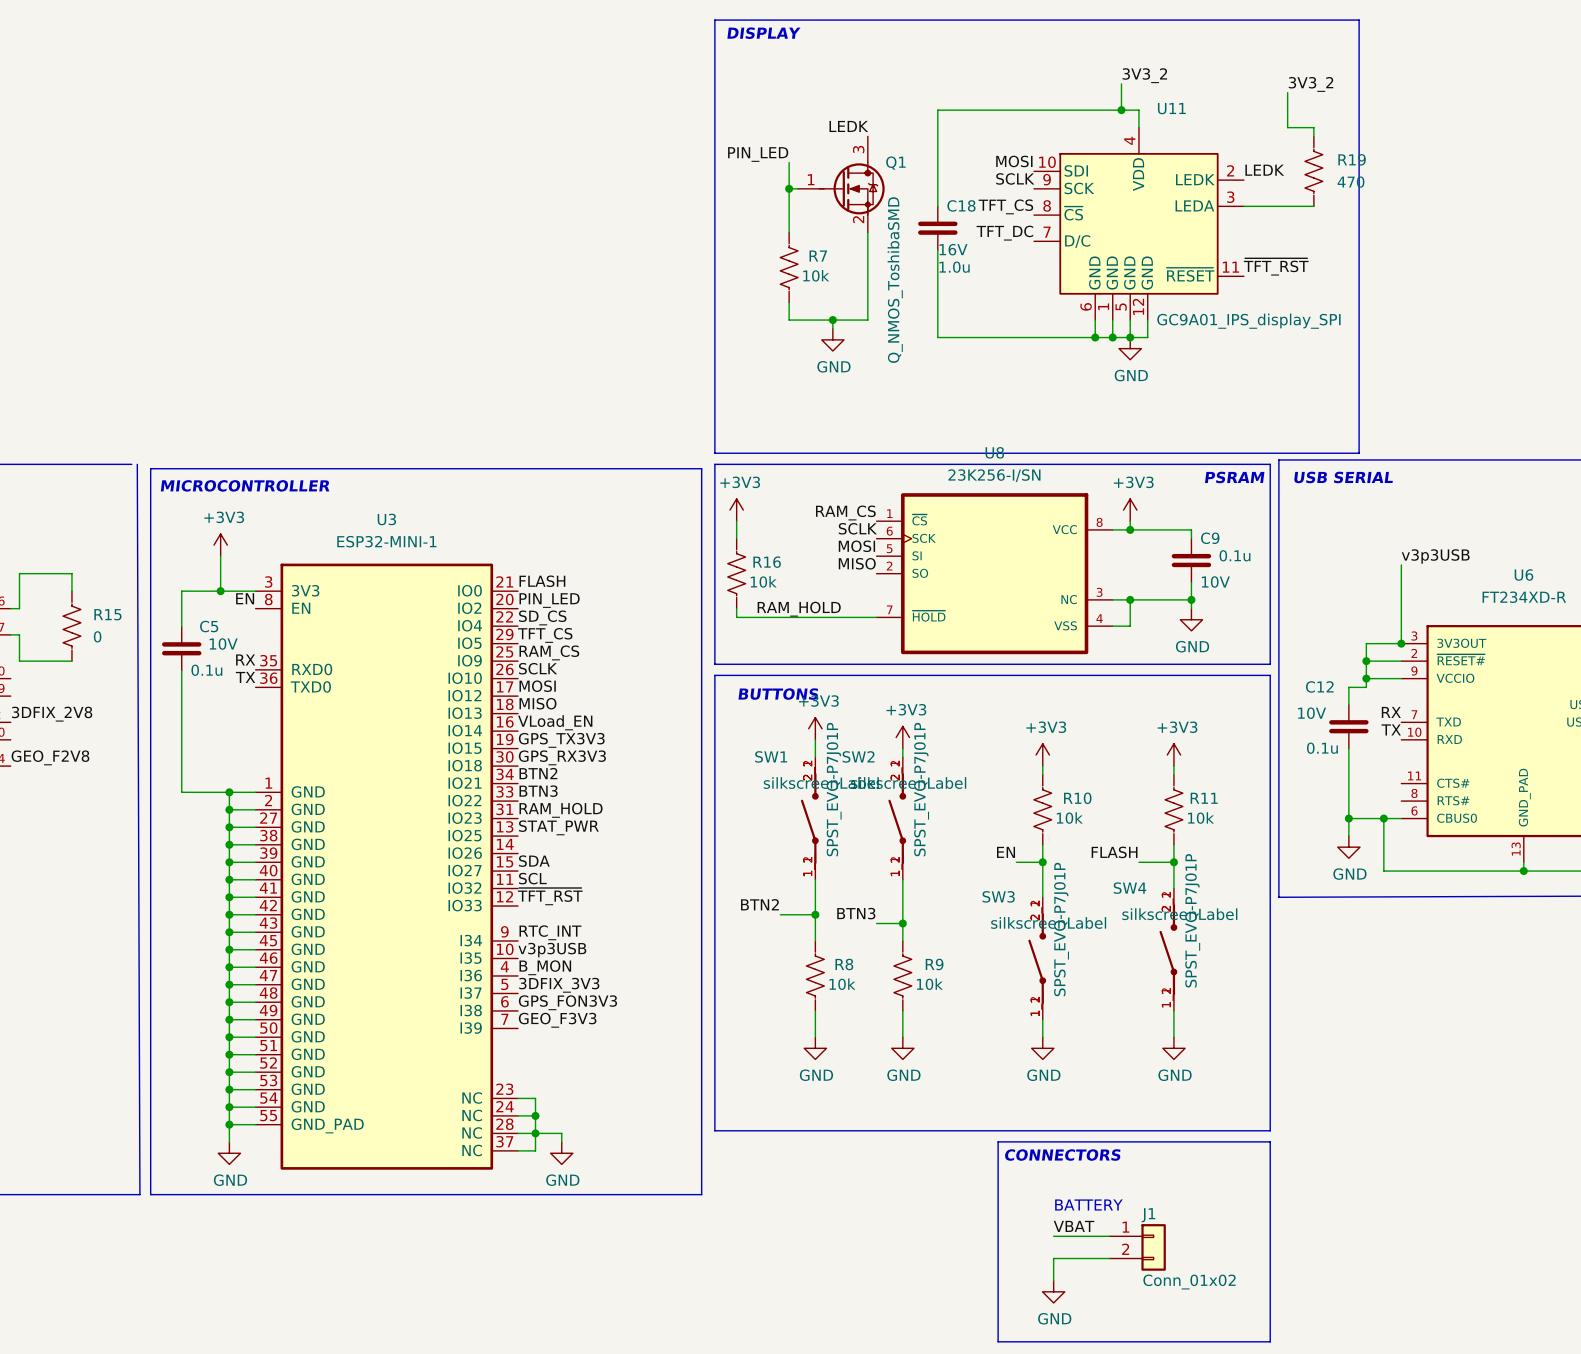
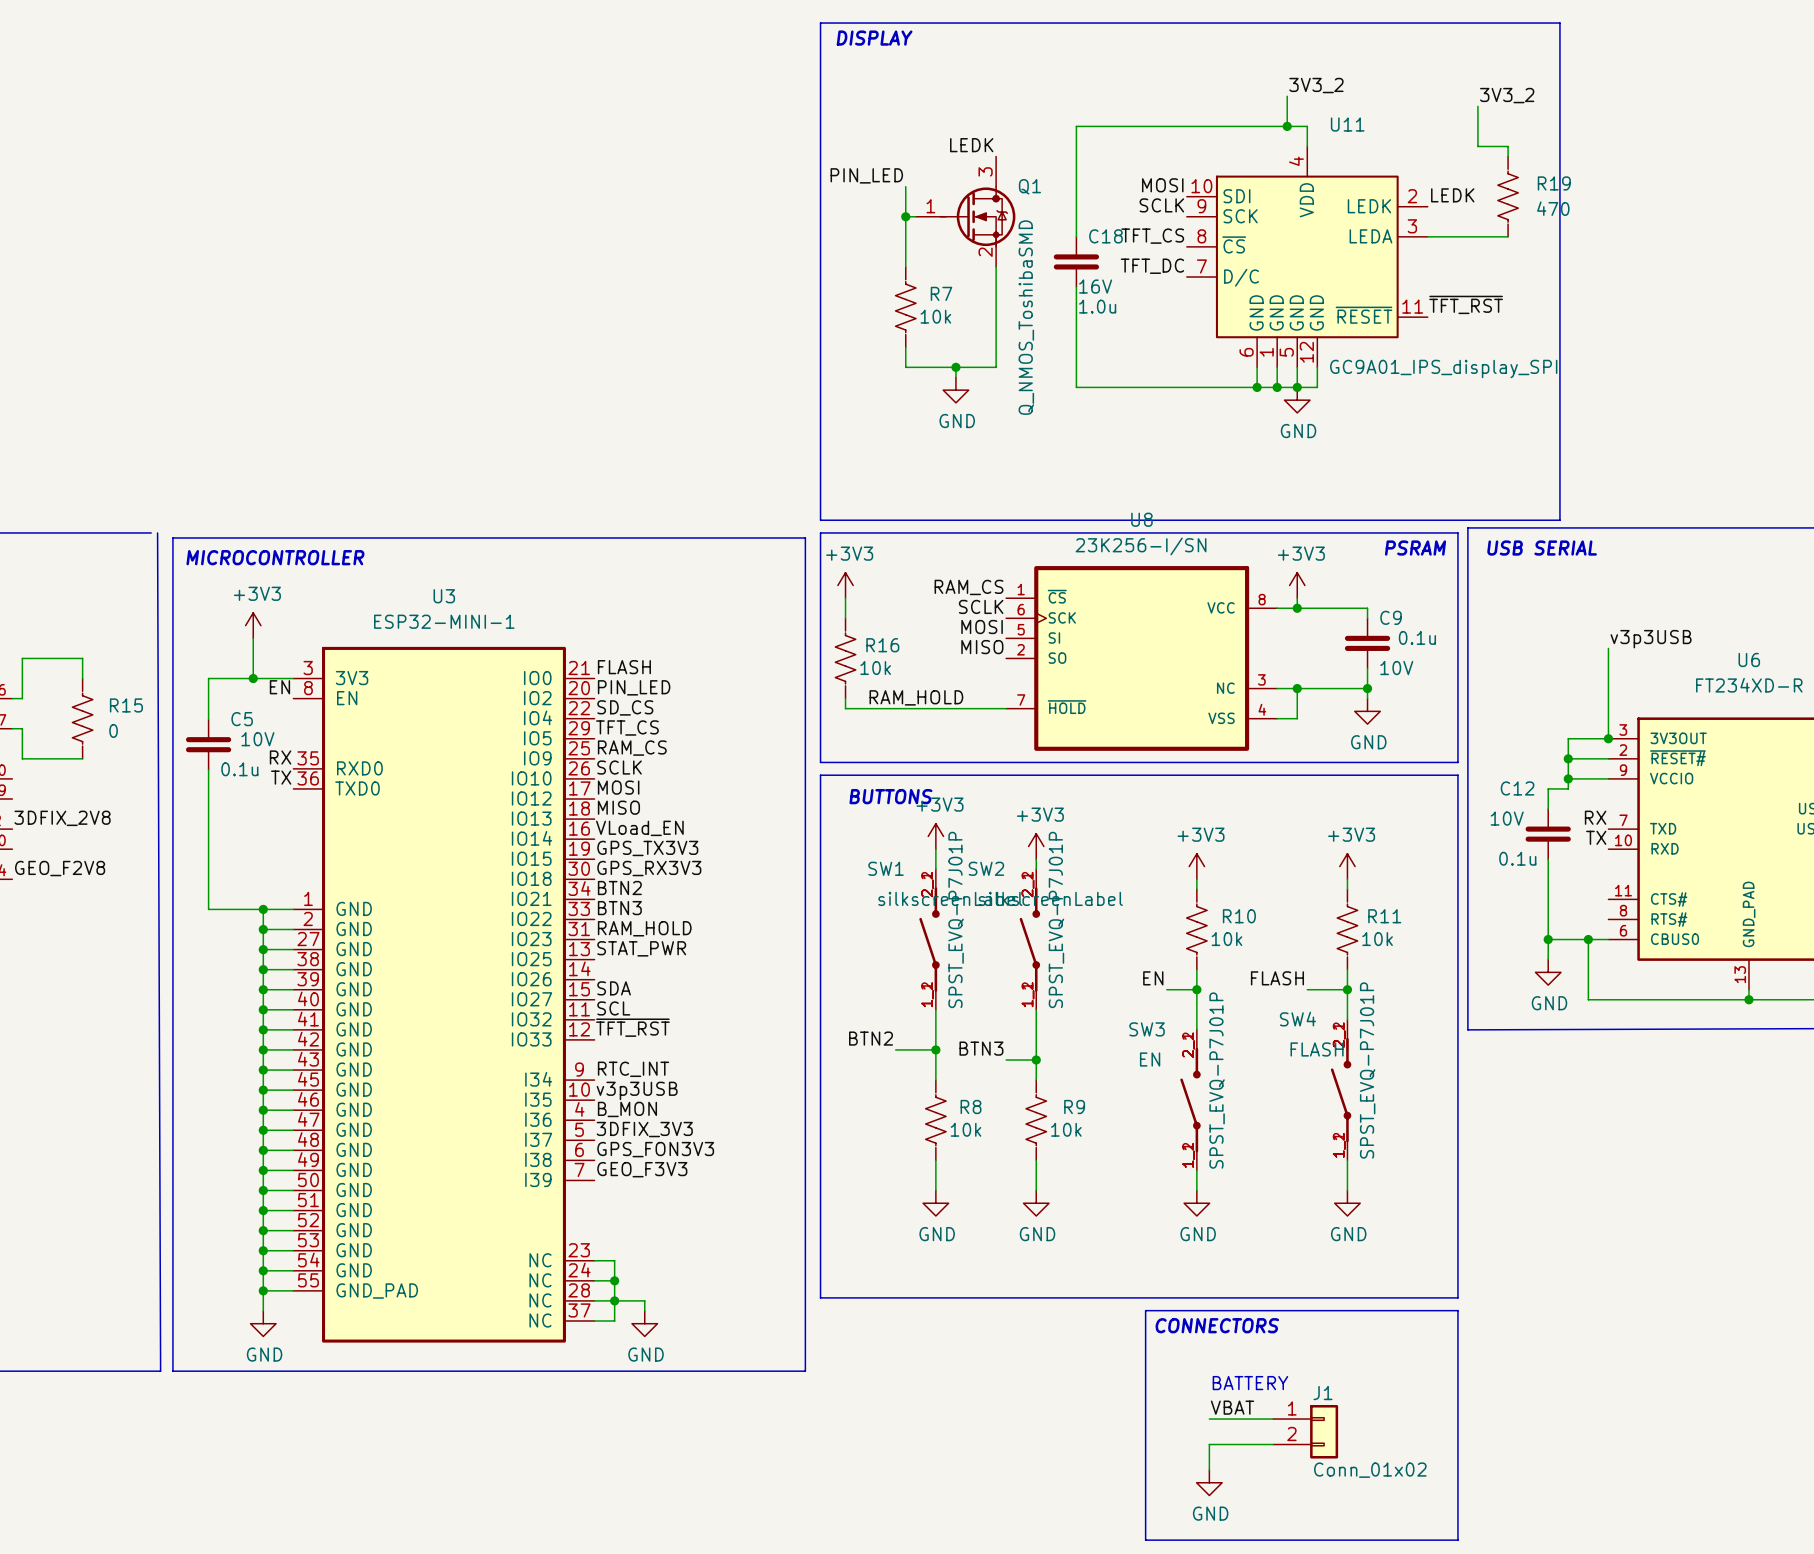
SW4 text: silkscreenLabel (1179, 914) -> FLASH (1317, 1049)
SW3 text: silkscreenLabel (1048, 922) -> EN (1150, 1059)

